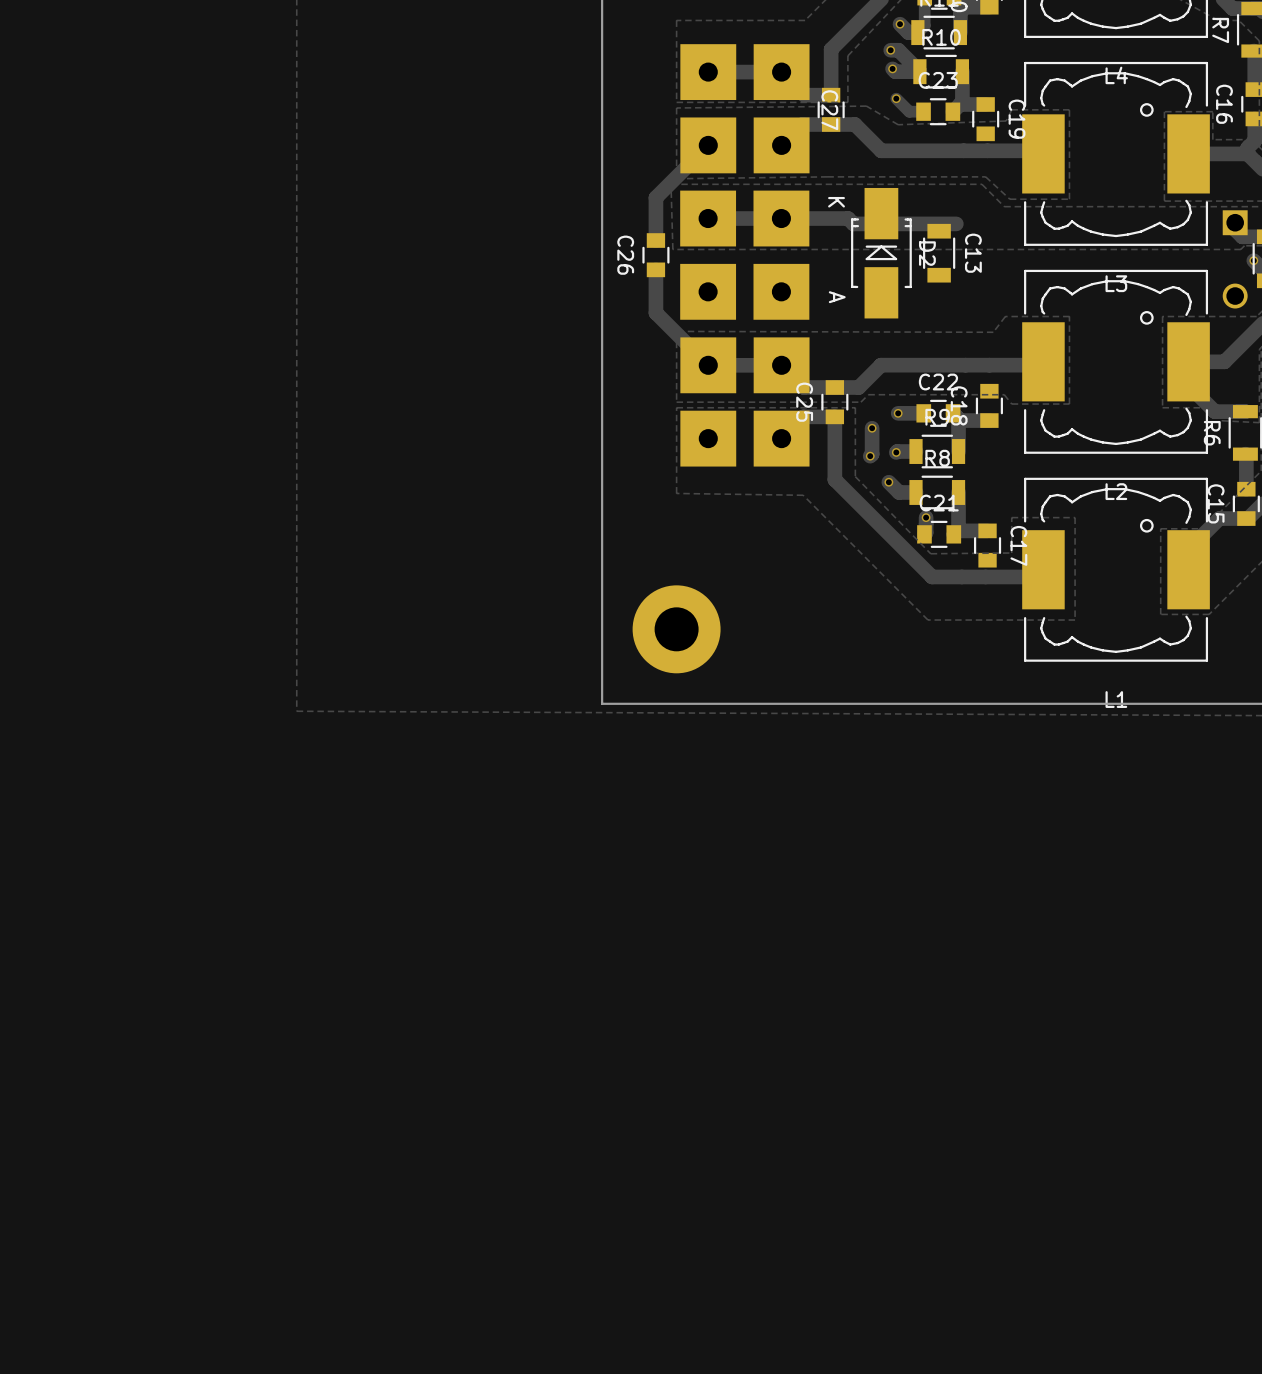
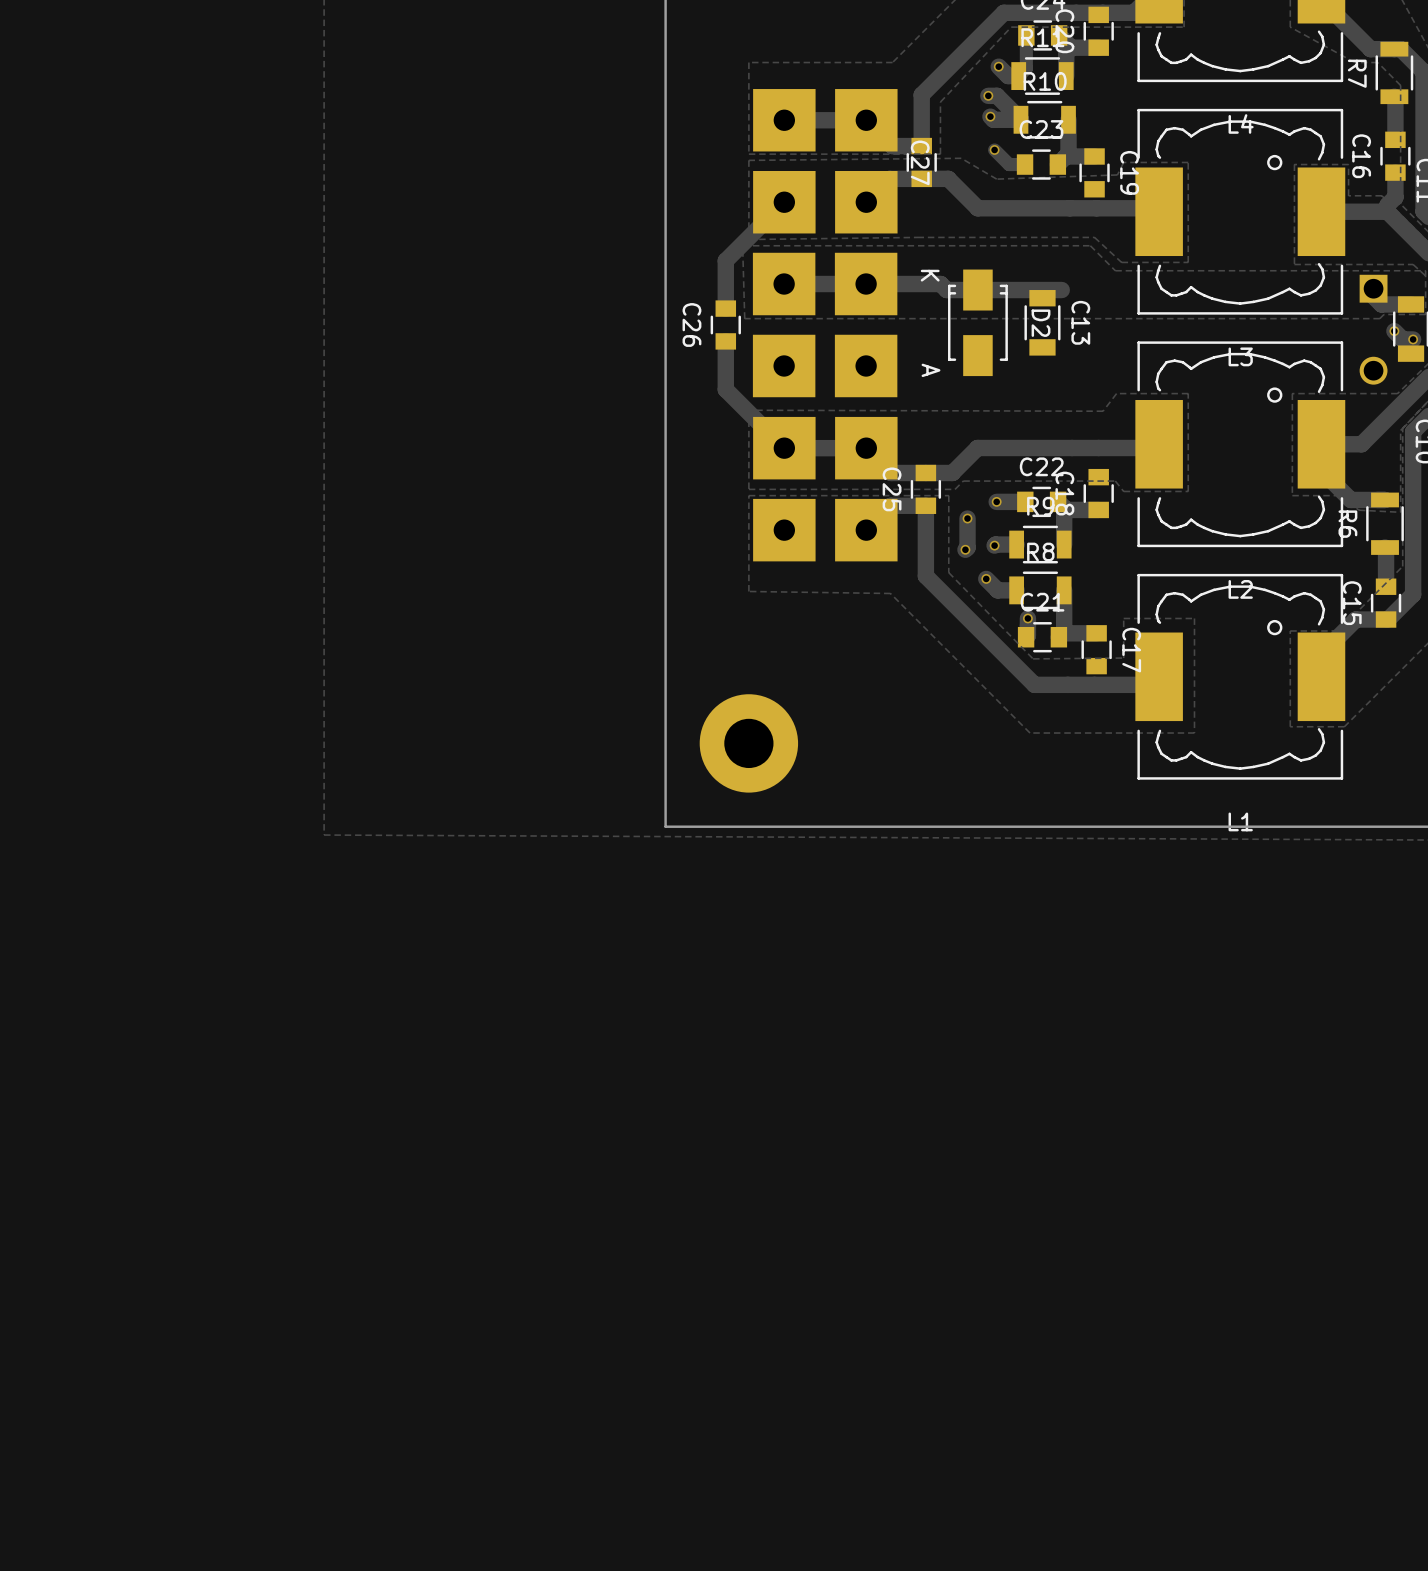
D2 footprint: [851, 187, 912, 319] -> [948, 269, 1008, 377]

